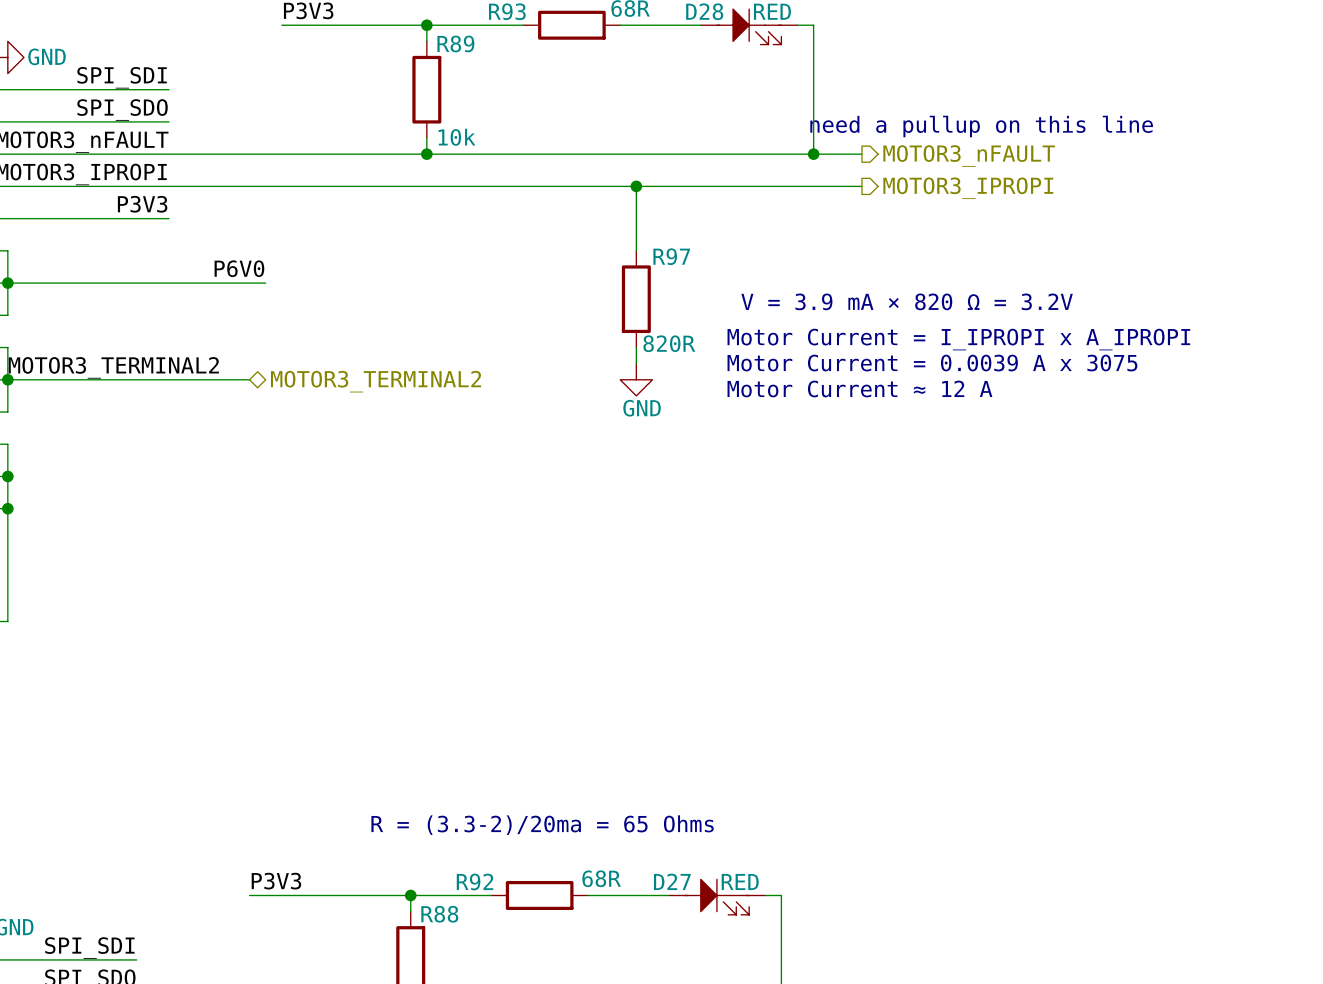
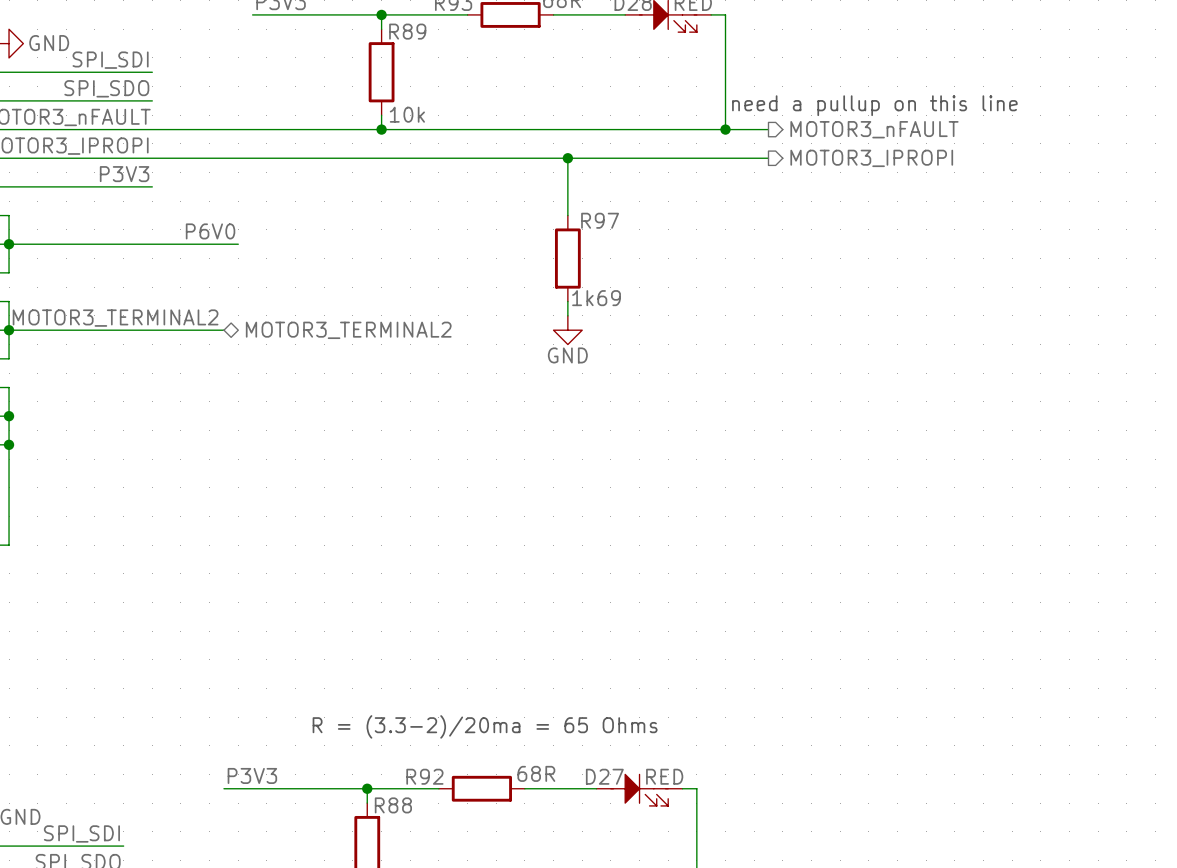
text: V = 3.9 mA × 820 Ω = 3.2V (907, 301) -> none
text: Motor Current = I_IPROPI x A_IPROPI (958, 339) -> none
R97 value: 820R (669, 343) -> 1k69 (596, 298)
text: Motor Current = 0.0039 A x 3075 (932, 363) -> none
text: Motor Current ≈ 12 A (859, 388) -> none

